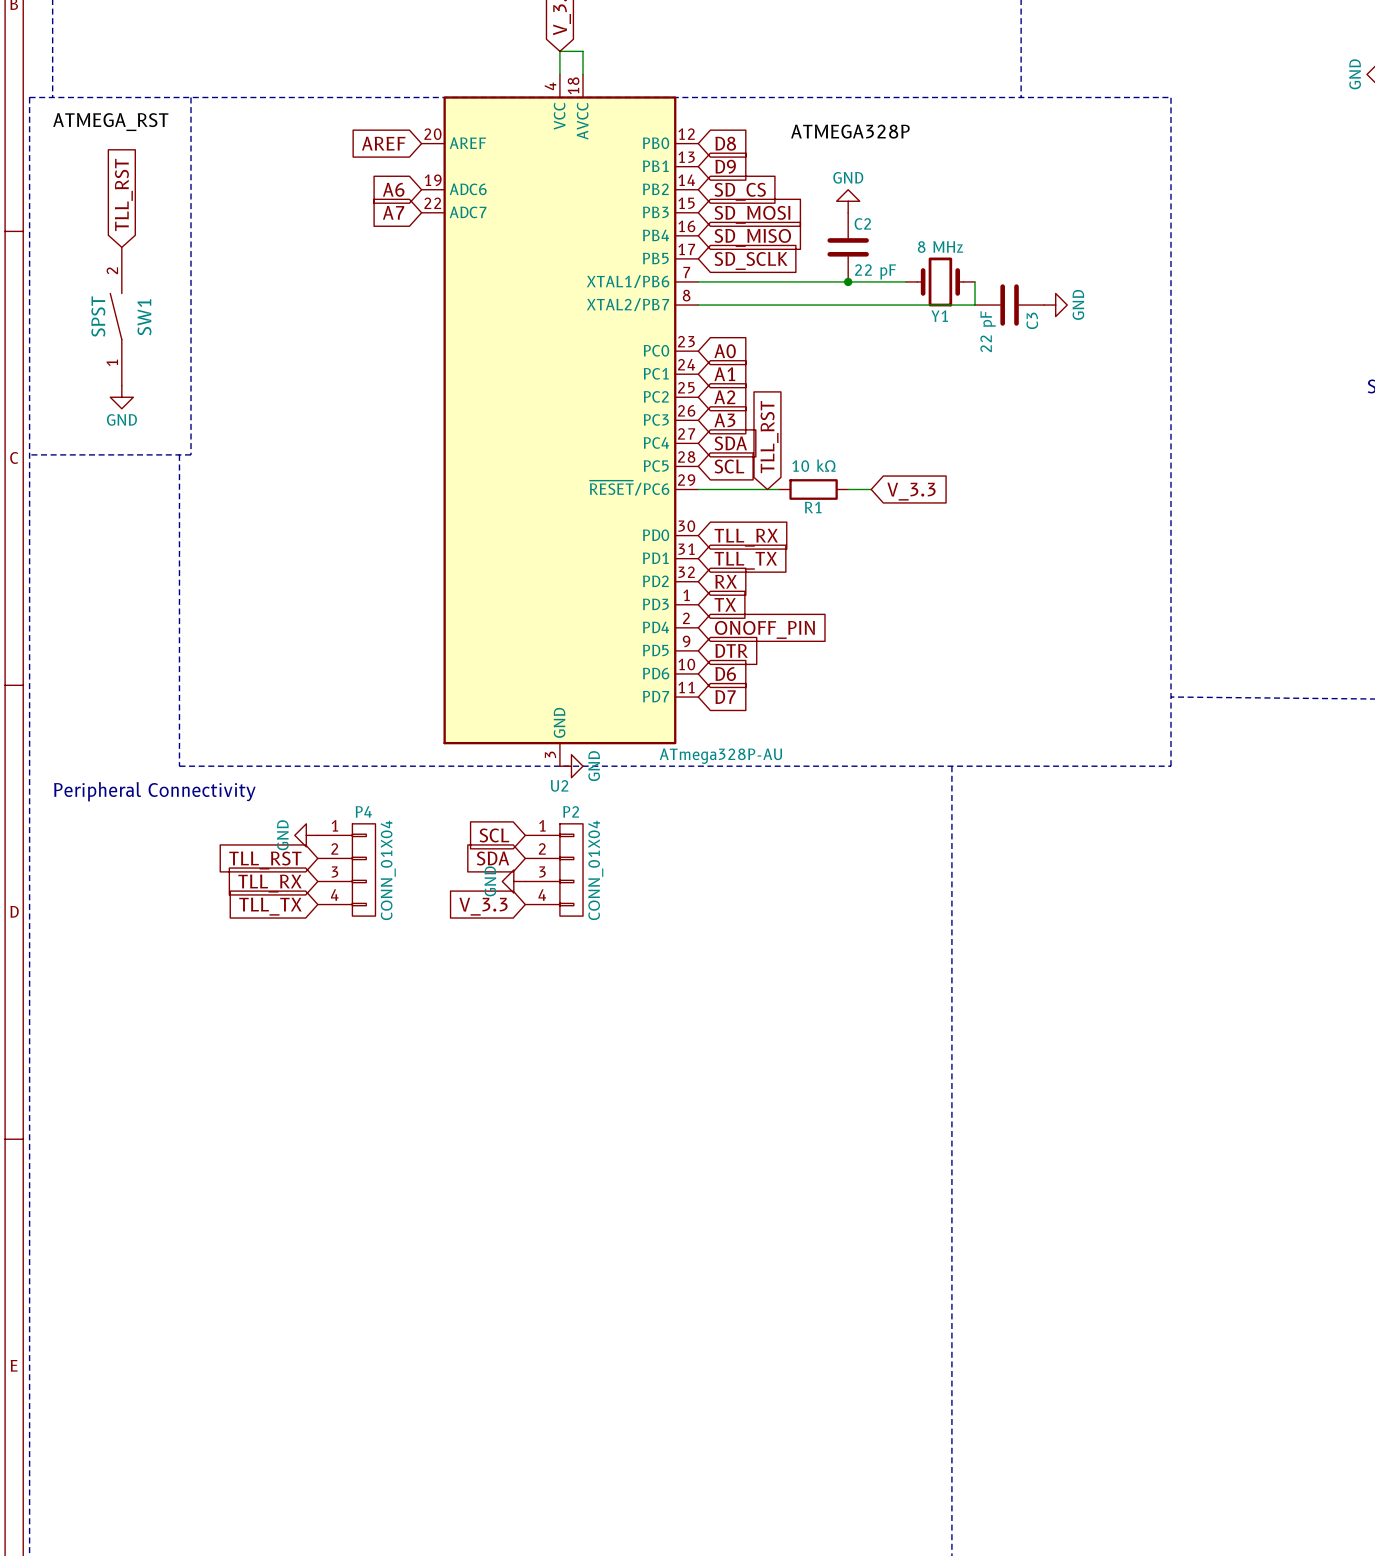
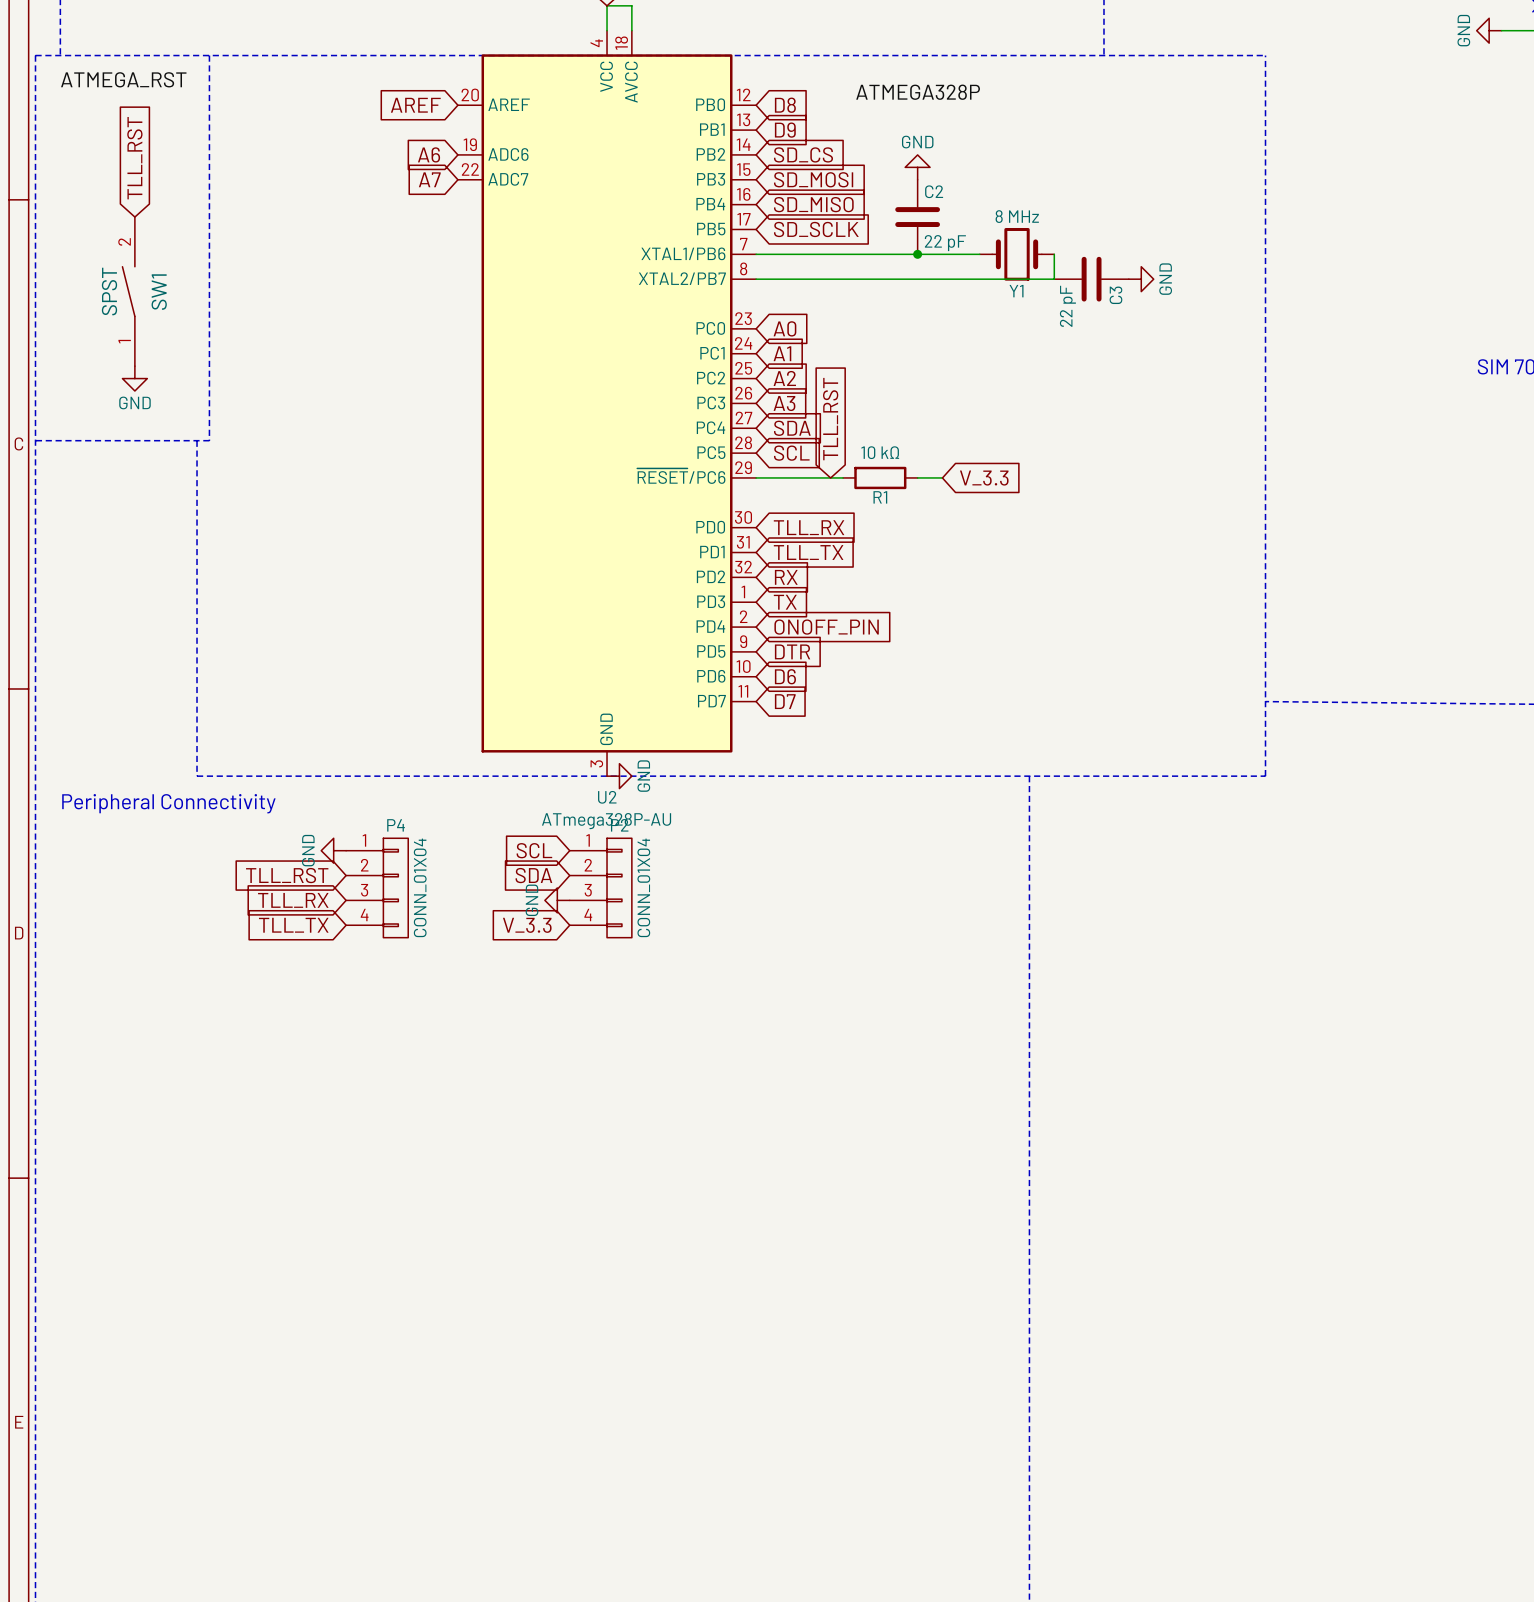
U2 value position: ATmega328P-AU (720, 756) -> ATmega328P-AU (606, 821)

